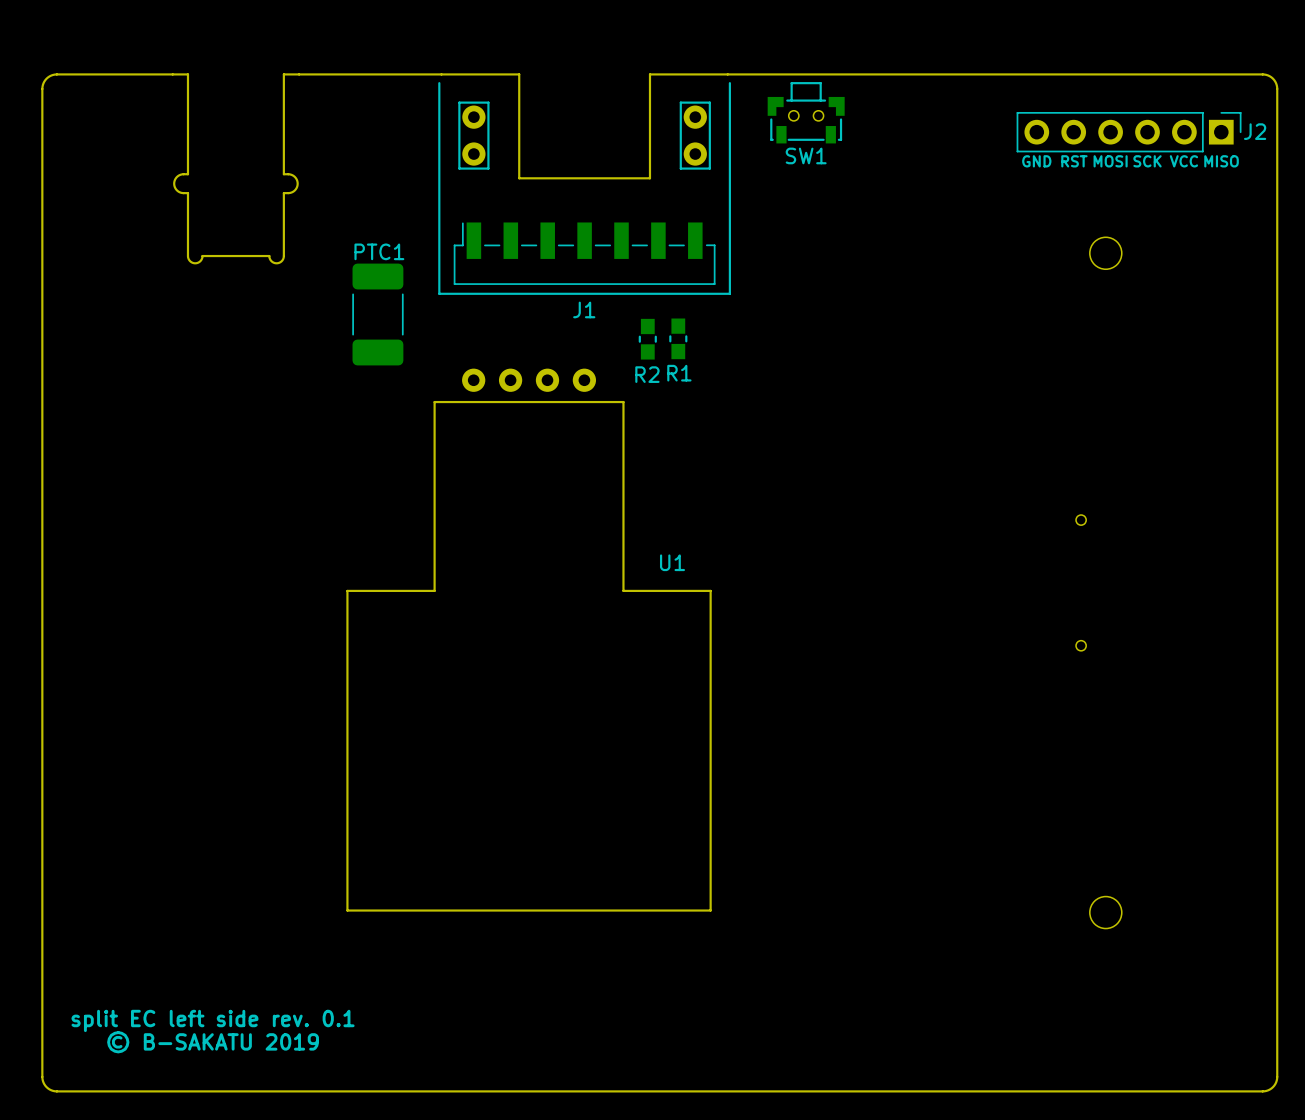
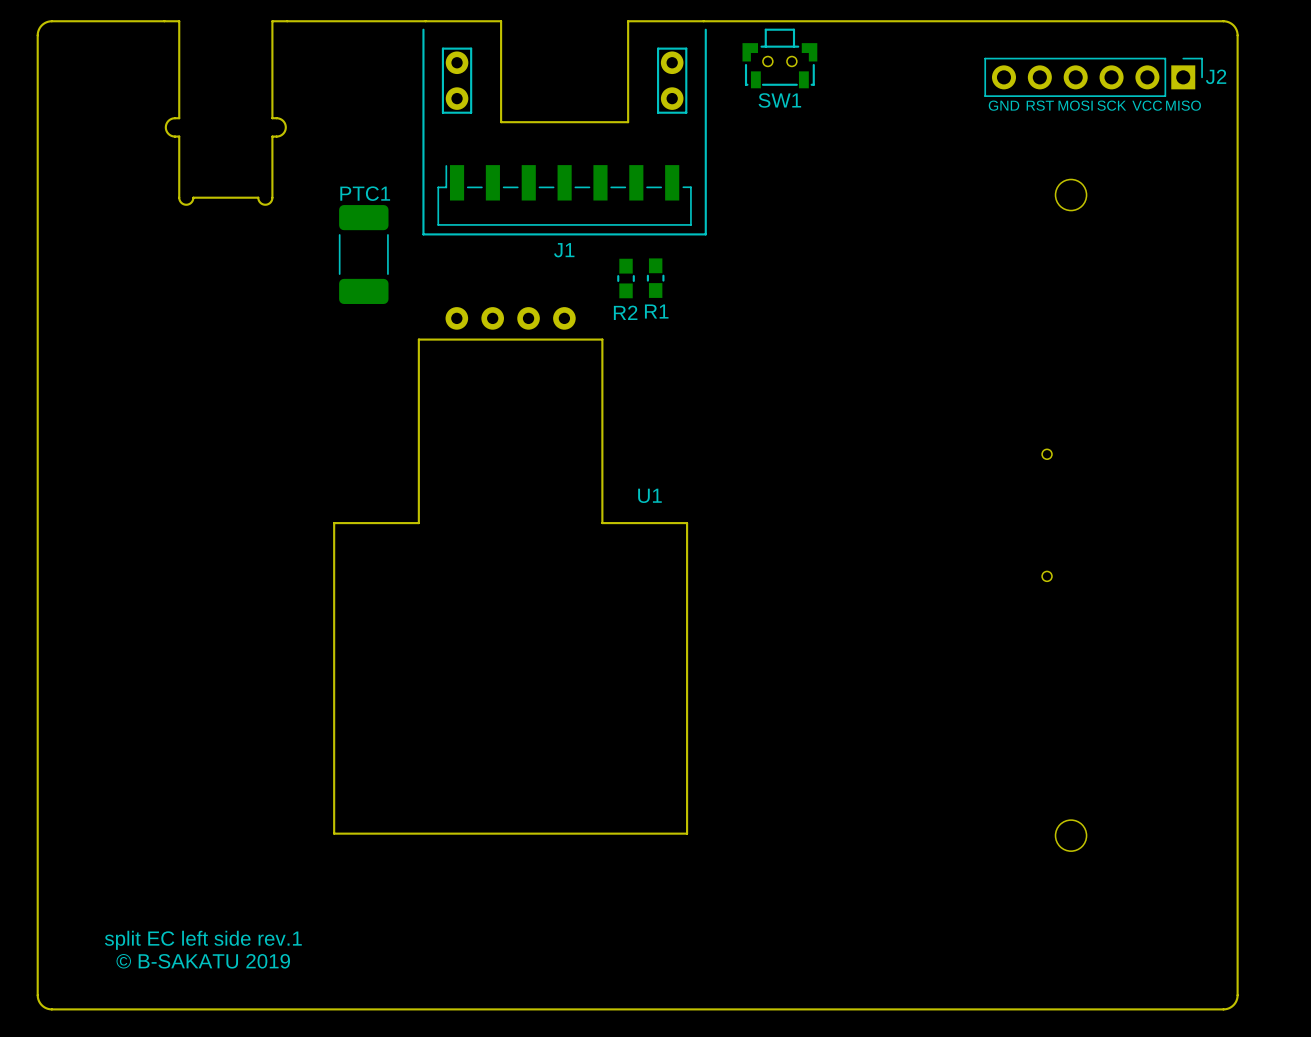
text: split EC left side rev. 0.1 (213, 1020) -> split EC left side rev.1 (203, 940)

